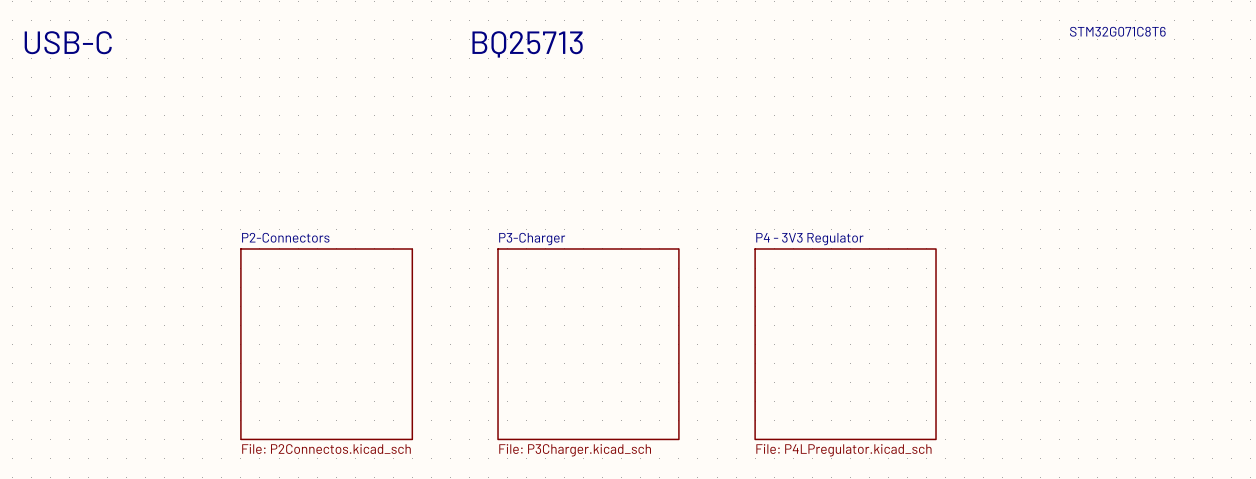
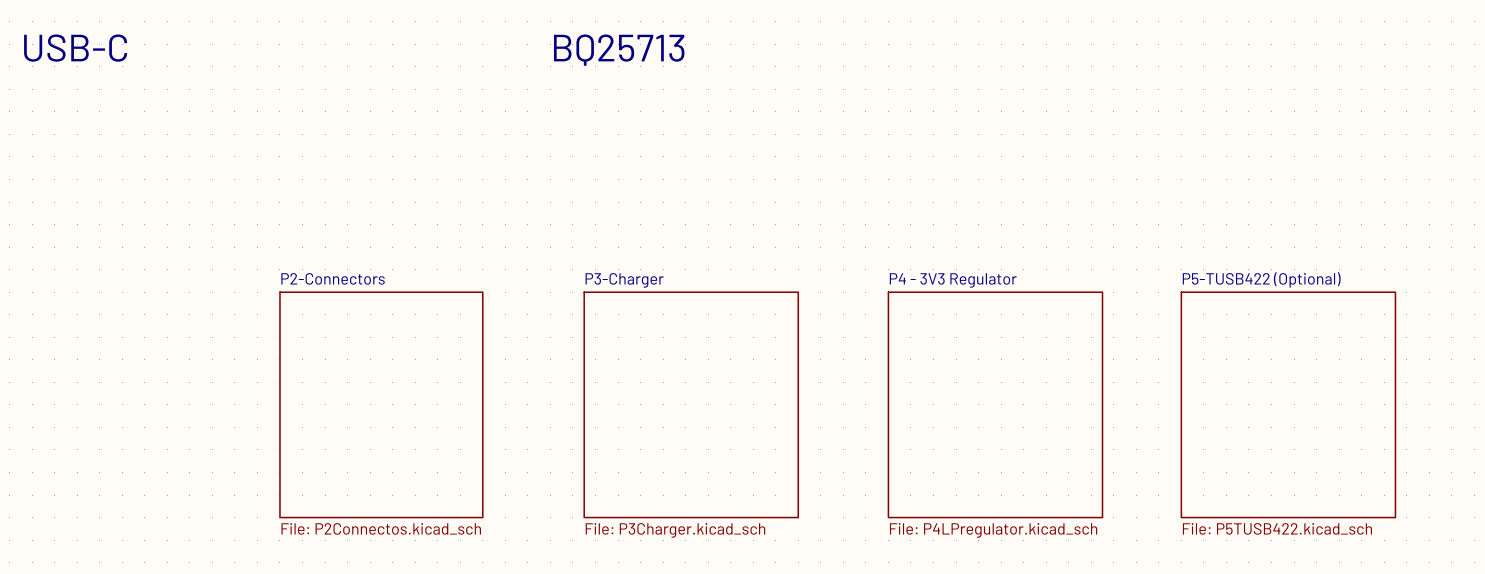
text: STM32G071C8T6 (1117, 31) -> none
sheet P5-TUSB422 (Optional): none -> File: P5TUSB422.kicad_sch (1288, 404)

